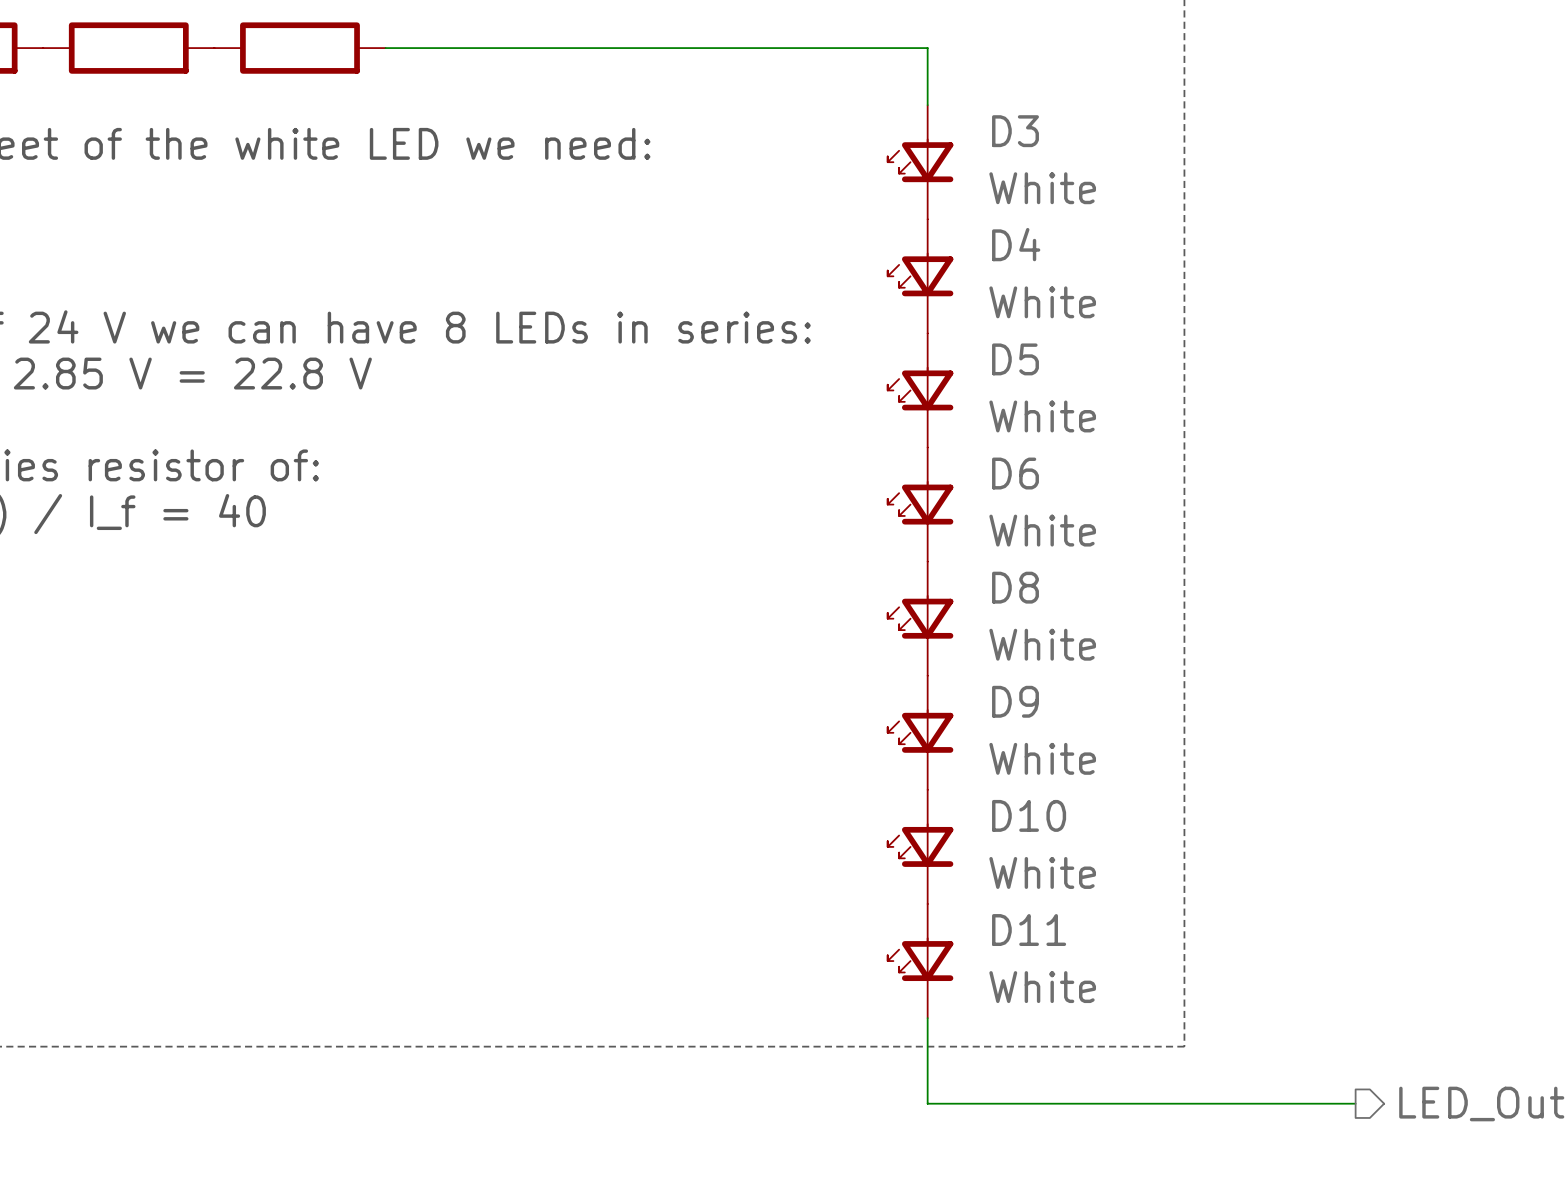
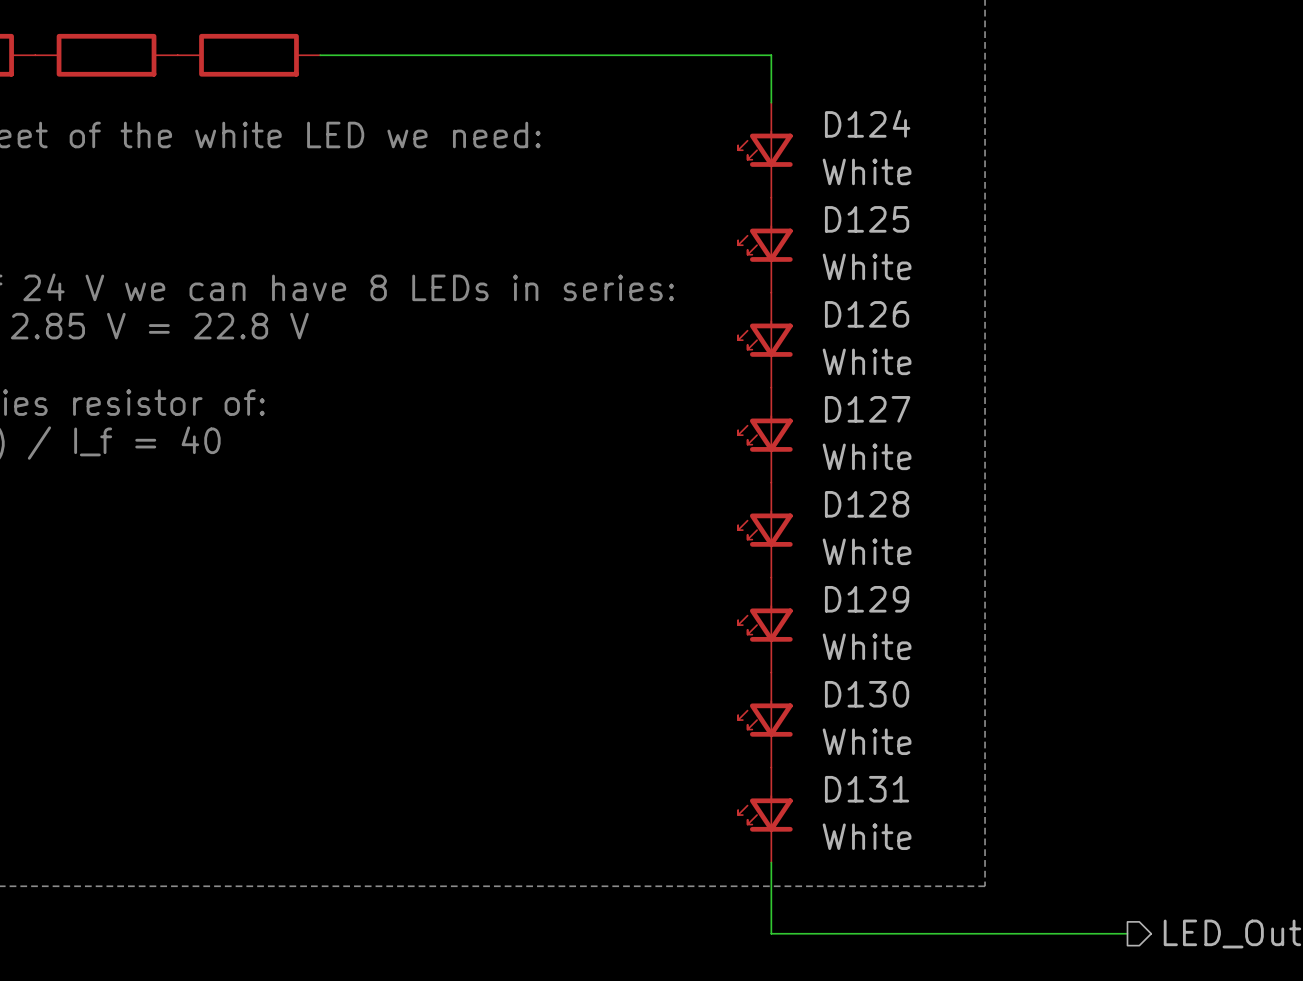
D3 name: D3 (1015, 131) -> D124 (867, 123)
D4 name: D4 (1016, 244) -> D125 (867, 219)
D5 name: D5 (1015, 359) -> D126 (867, 314)
D6 name: D6 (1015, 473) -> D127 (867, 409)
D8 name: D8 (1015, 587) -> D128 (867, 504)
D9 name: D9 (1015, 701) -> D129 (867, 599)
D10 name: D10 (1029, 815) -> D130 (867, 694)
D11 name: D11 (1029, 930) -> D131 (867, 789)

